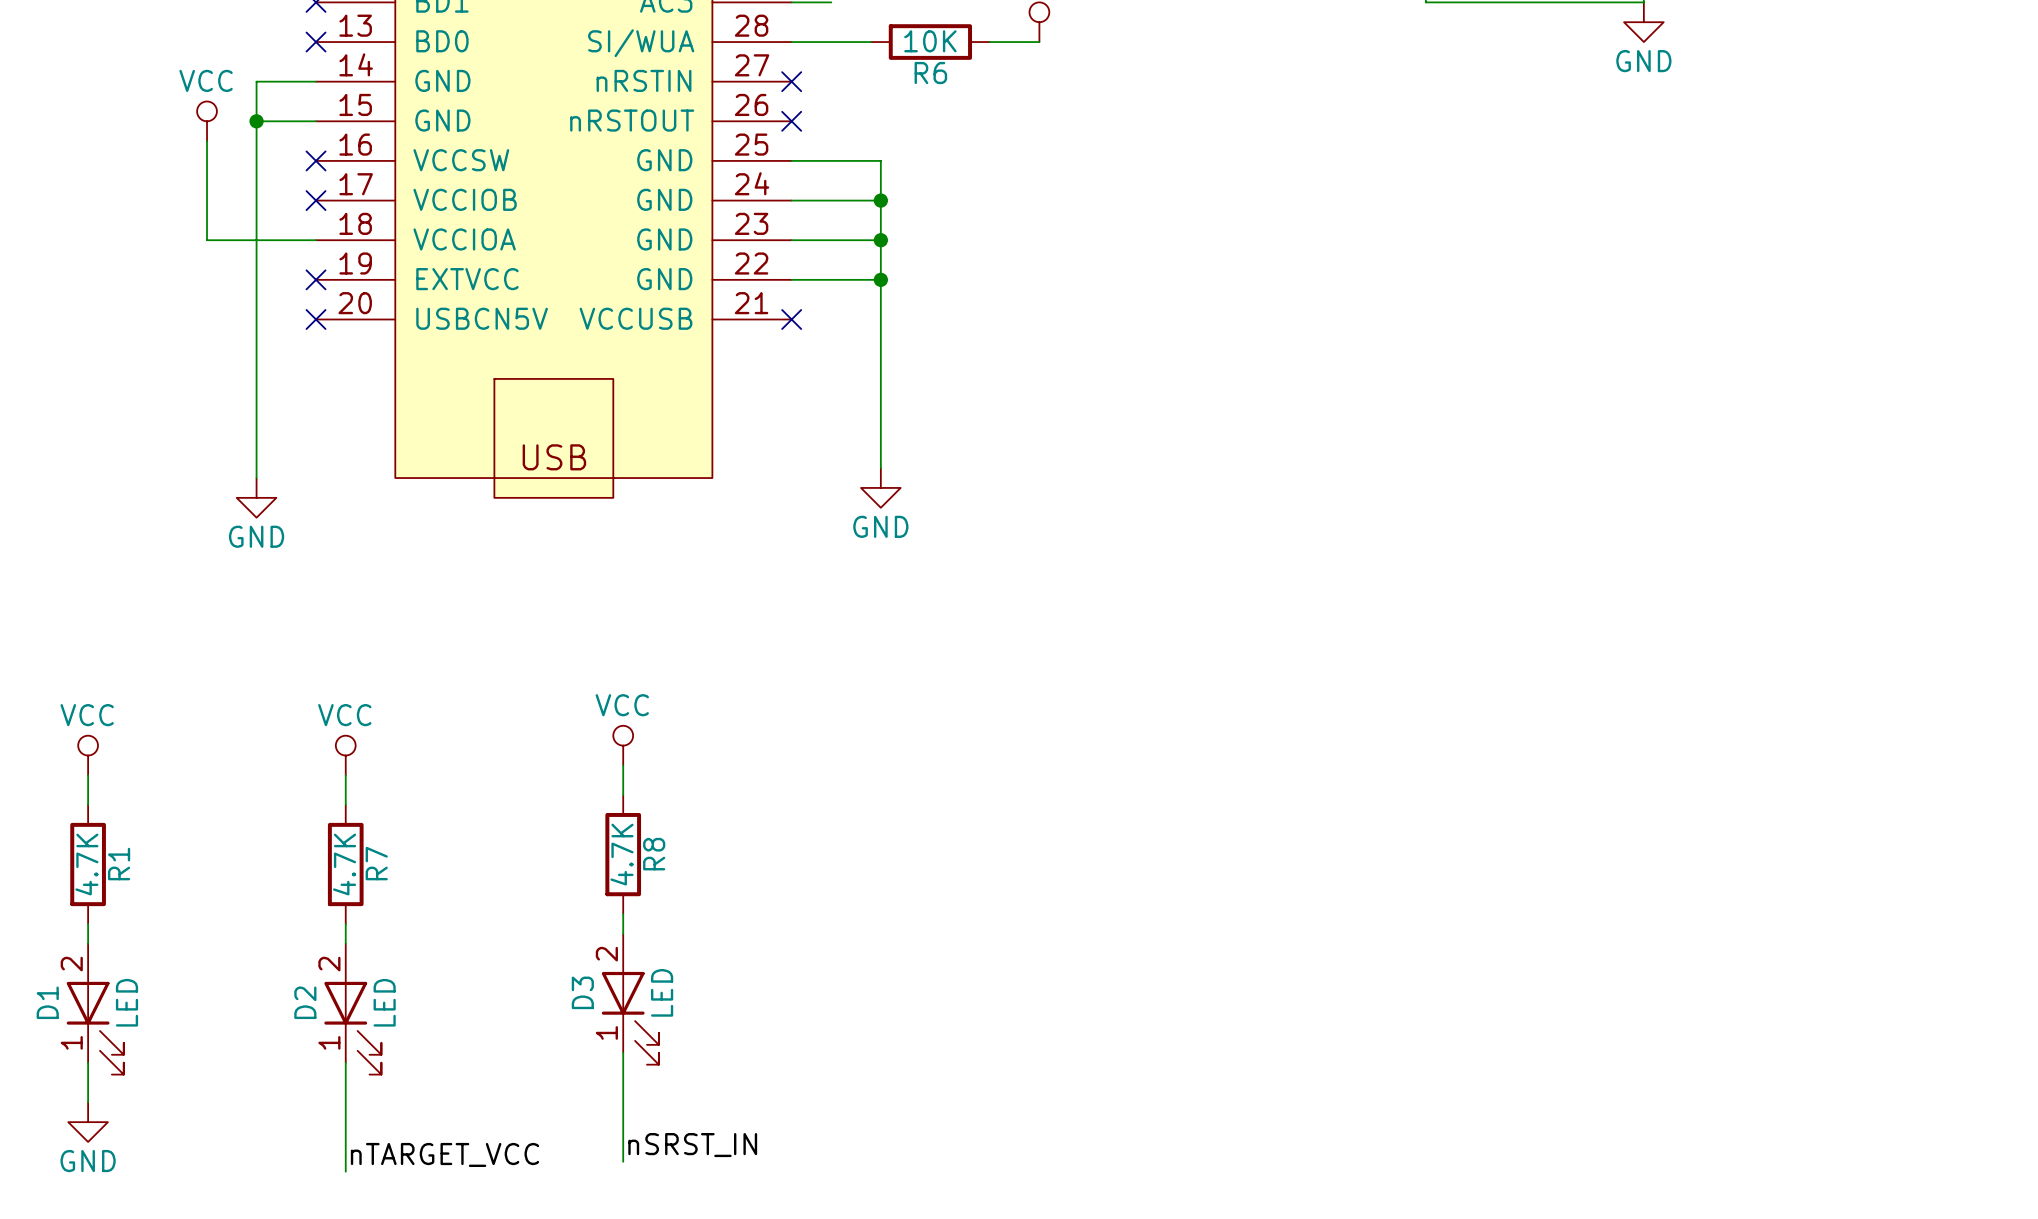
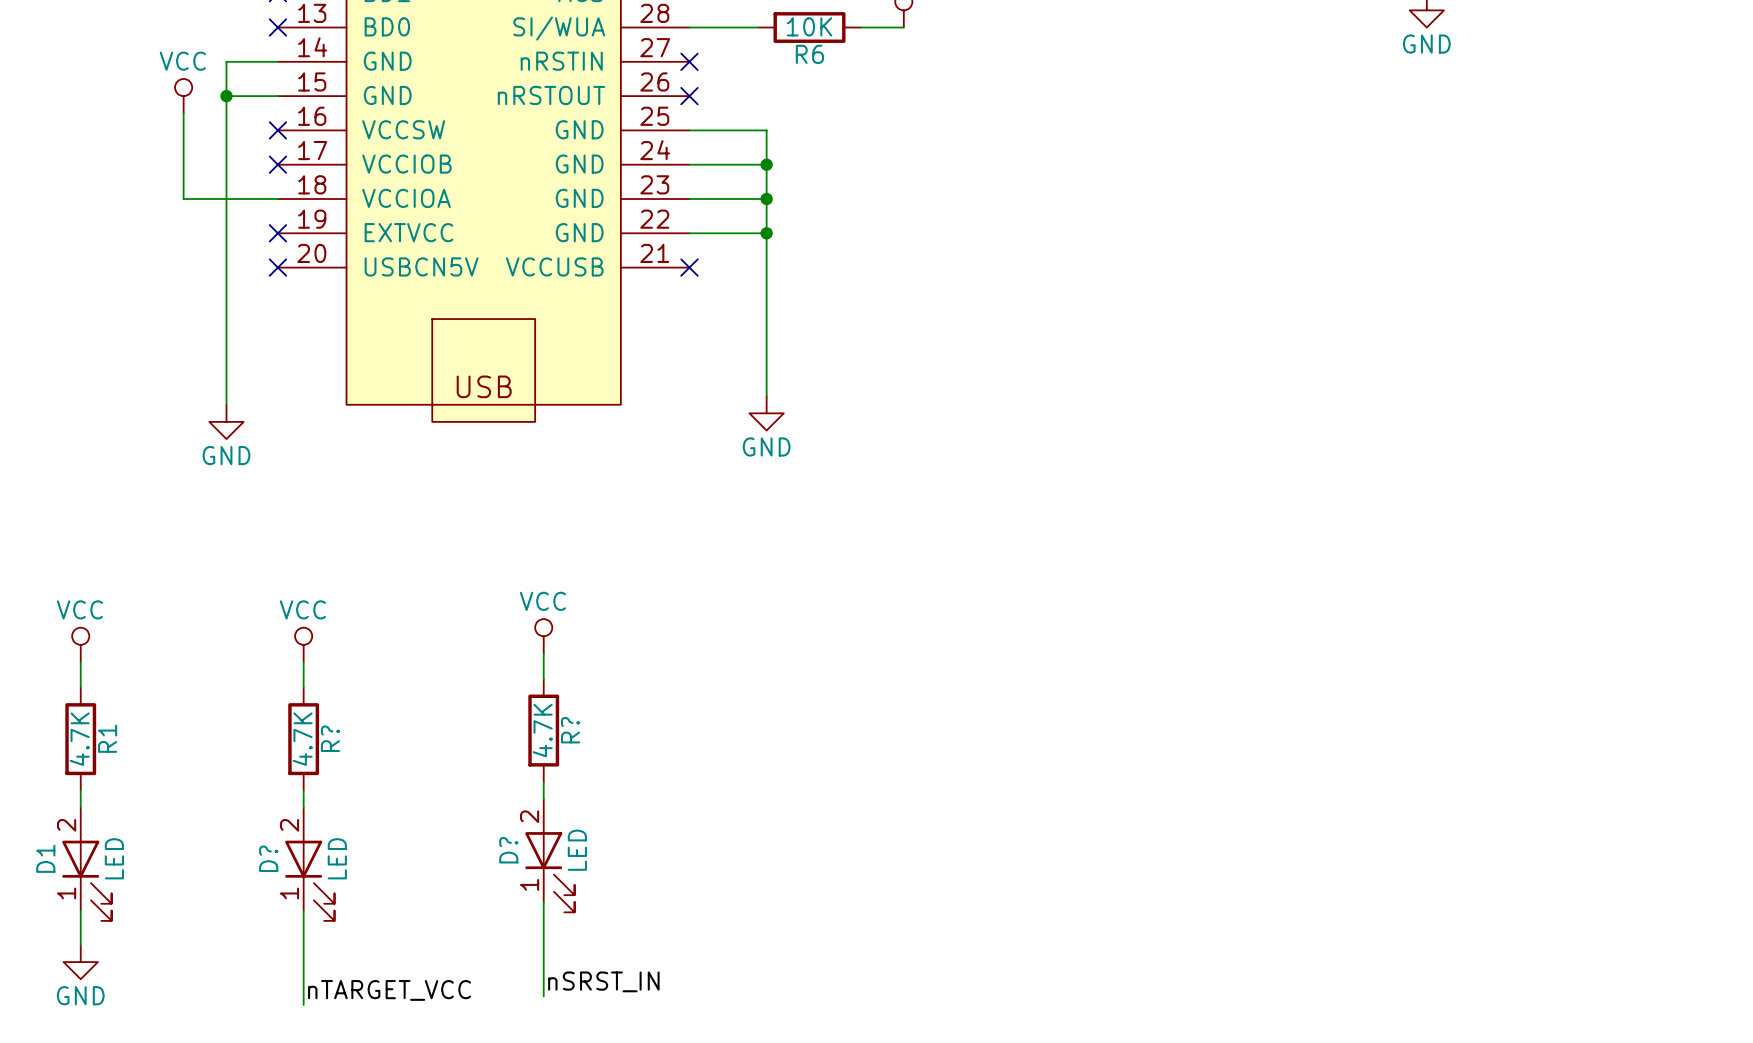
R8 name: R8 (654, 854) -> R? (570, 730)
R7 name: R7 (376, 863) -> R? (330, 738)
D3 name: D3 (582, 992) -> D? (508, 850)
D2 name: D2 (305, 1002) -> D? (268, 858)

